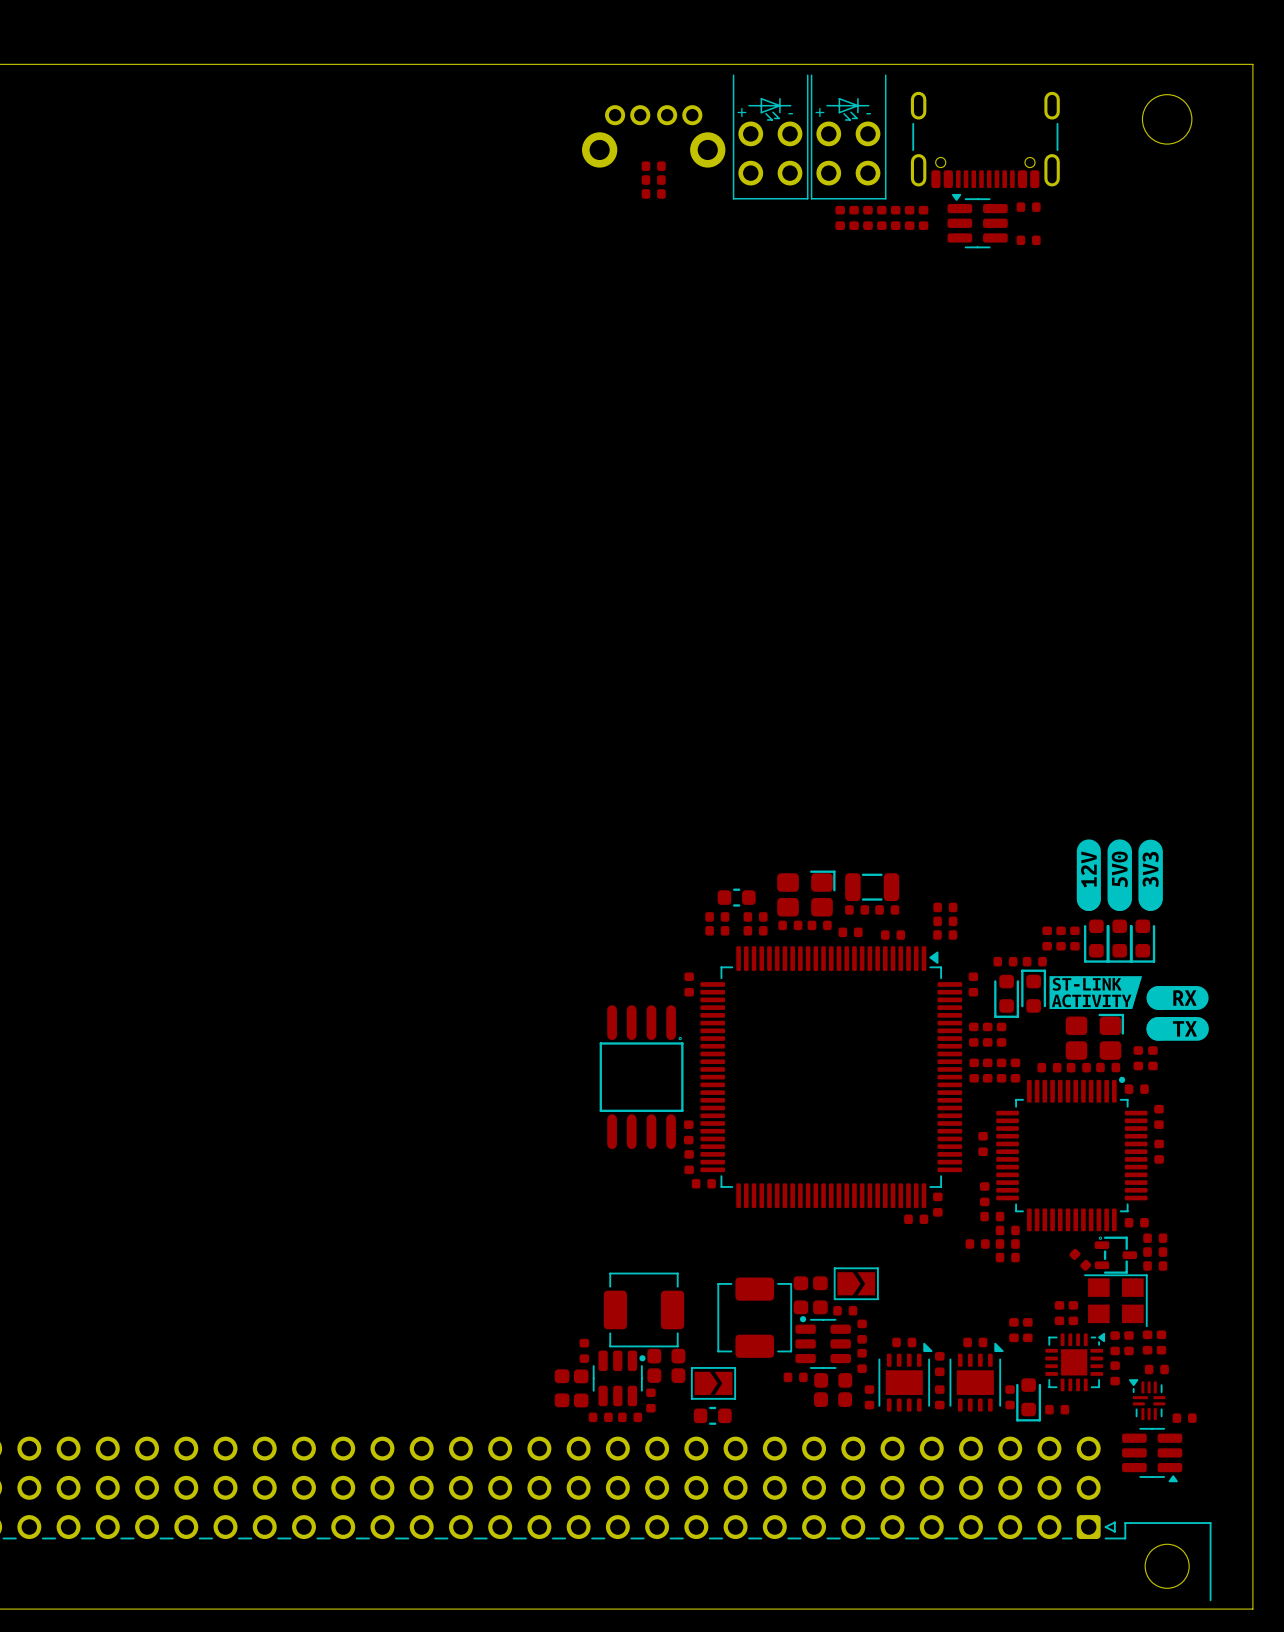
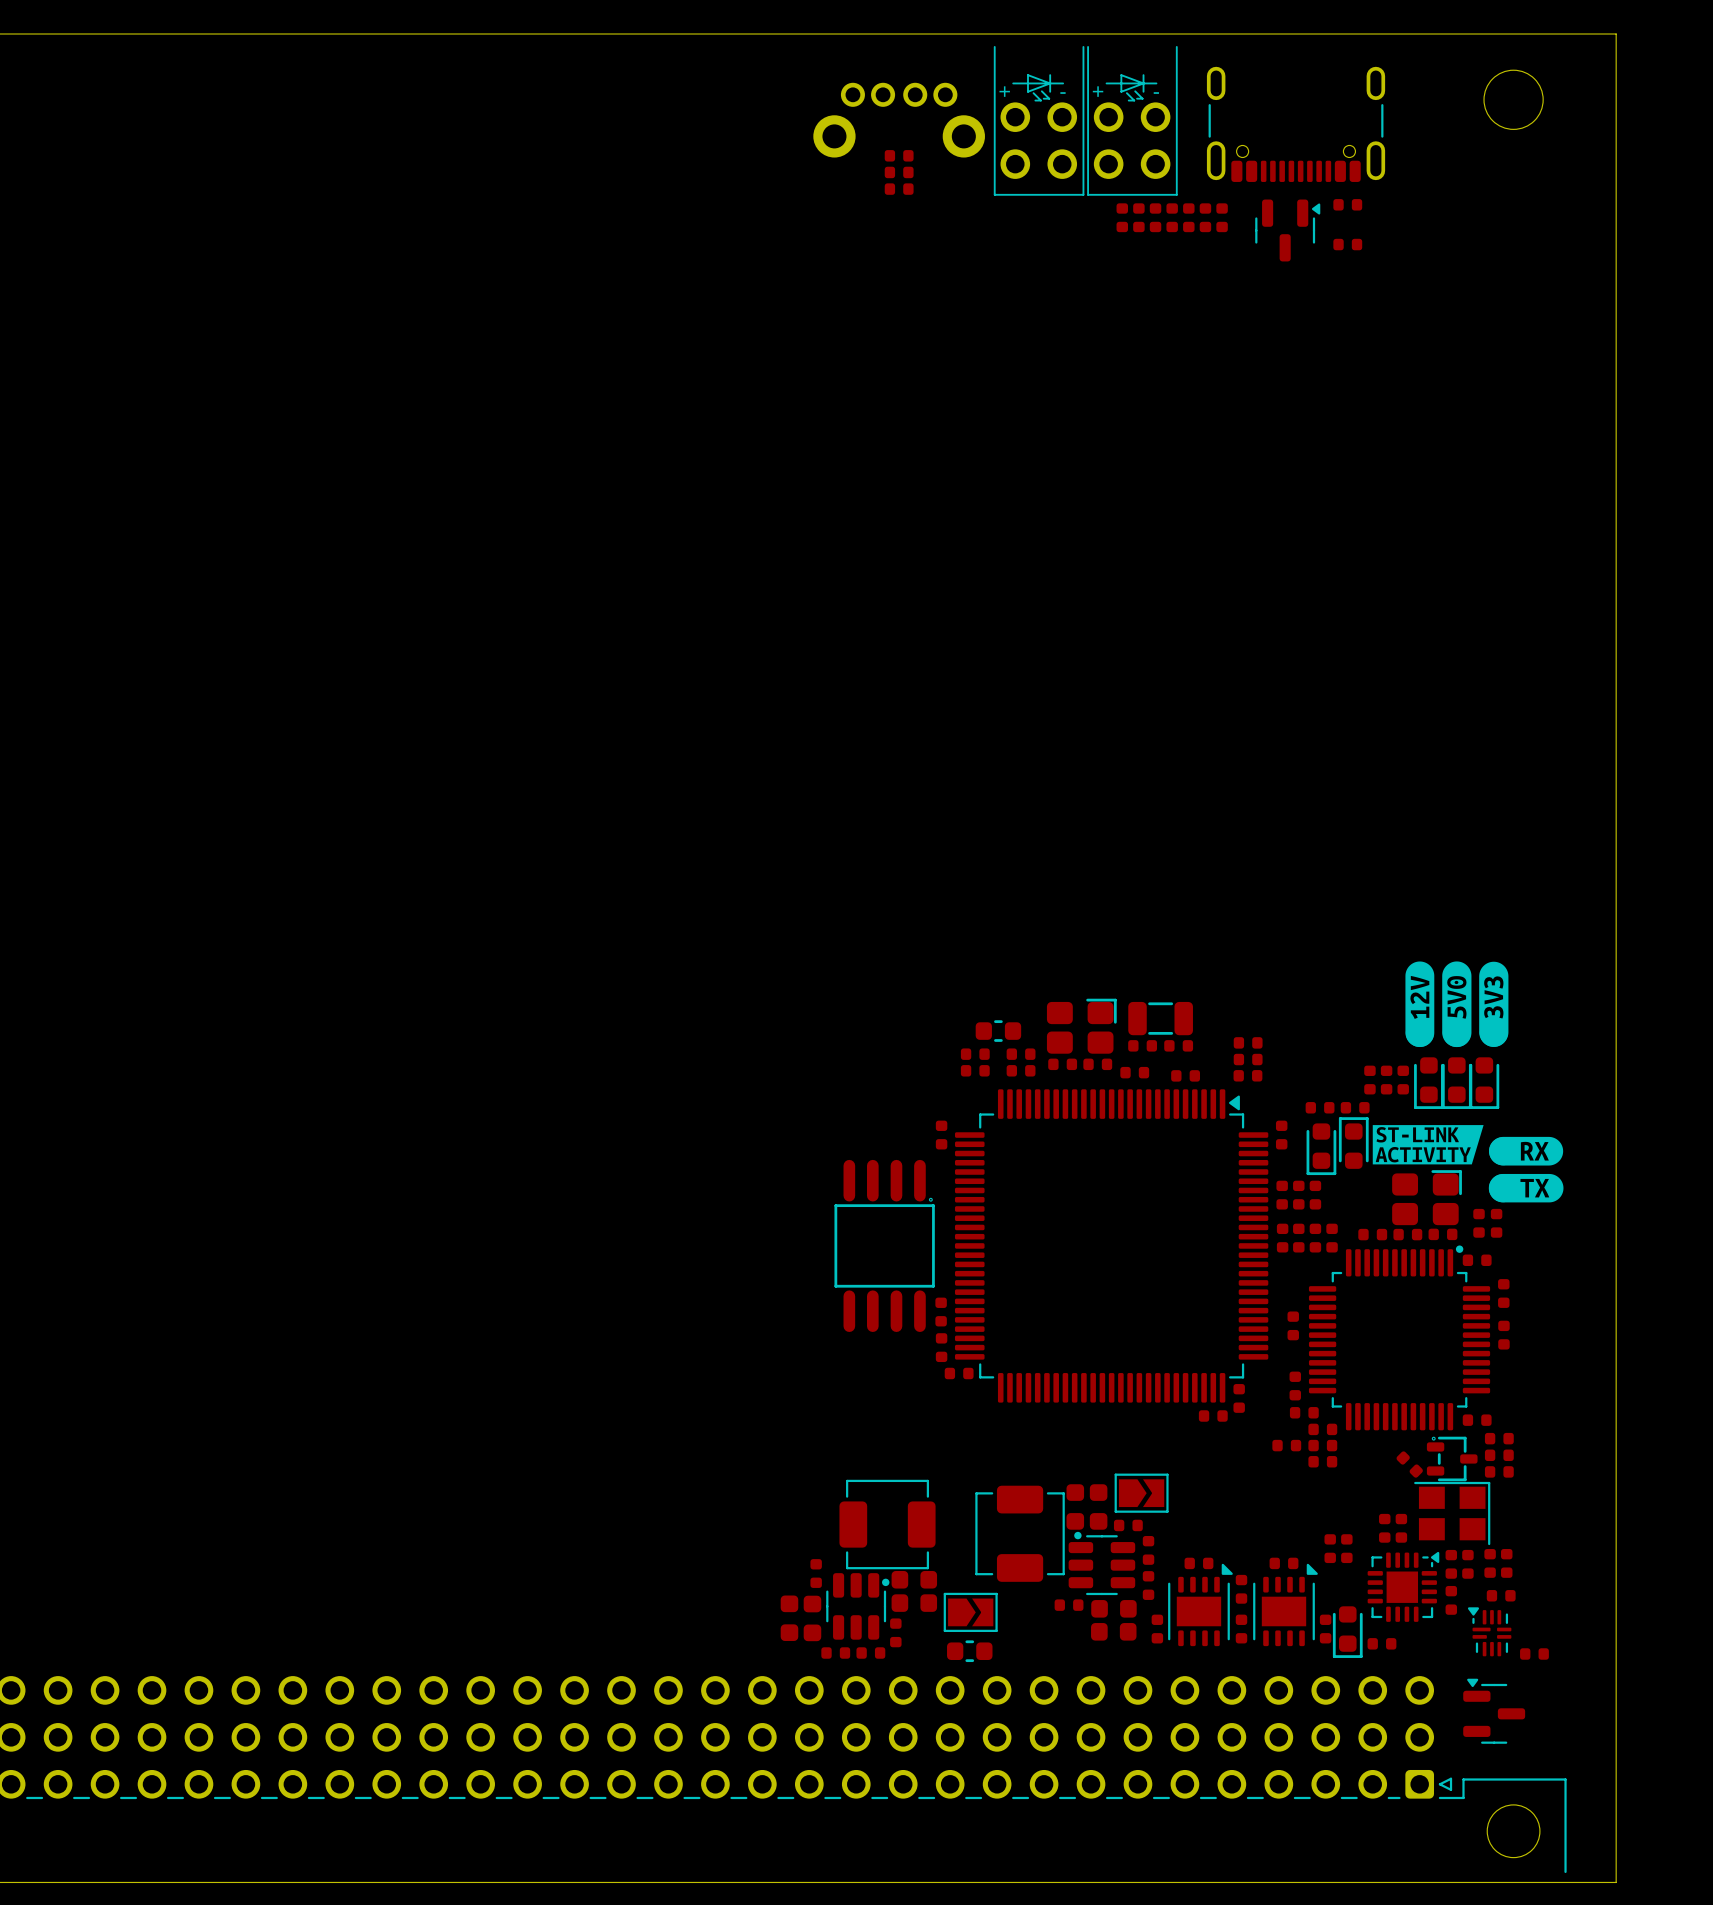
part footprint: [947, 193, 1008, 249] -> [1255, 199, 1321, 262]
part footprint: [1122, 1427, 1183, 1483] -> [1463, 1678, 1526, 1744]

